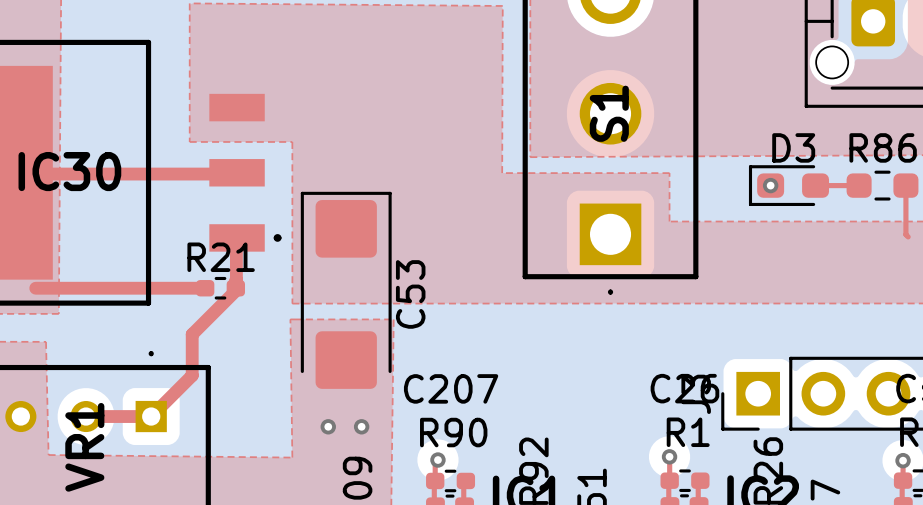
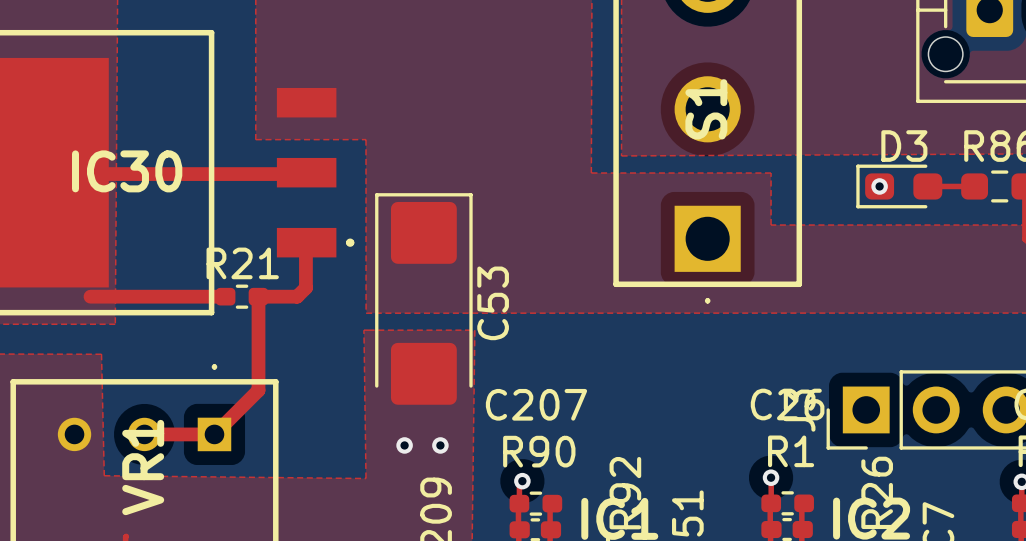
top track: (235, 280) (235, 290) (192, 334) -> (258, 296) (258, 346)
top track: none -> (305, 288) (297, 296) (272, 296)
top track: (161, 288) (192, 288) -> none
R21 position: (220, 288) -> (242, 296)

